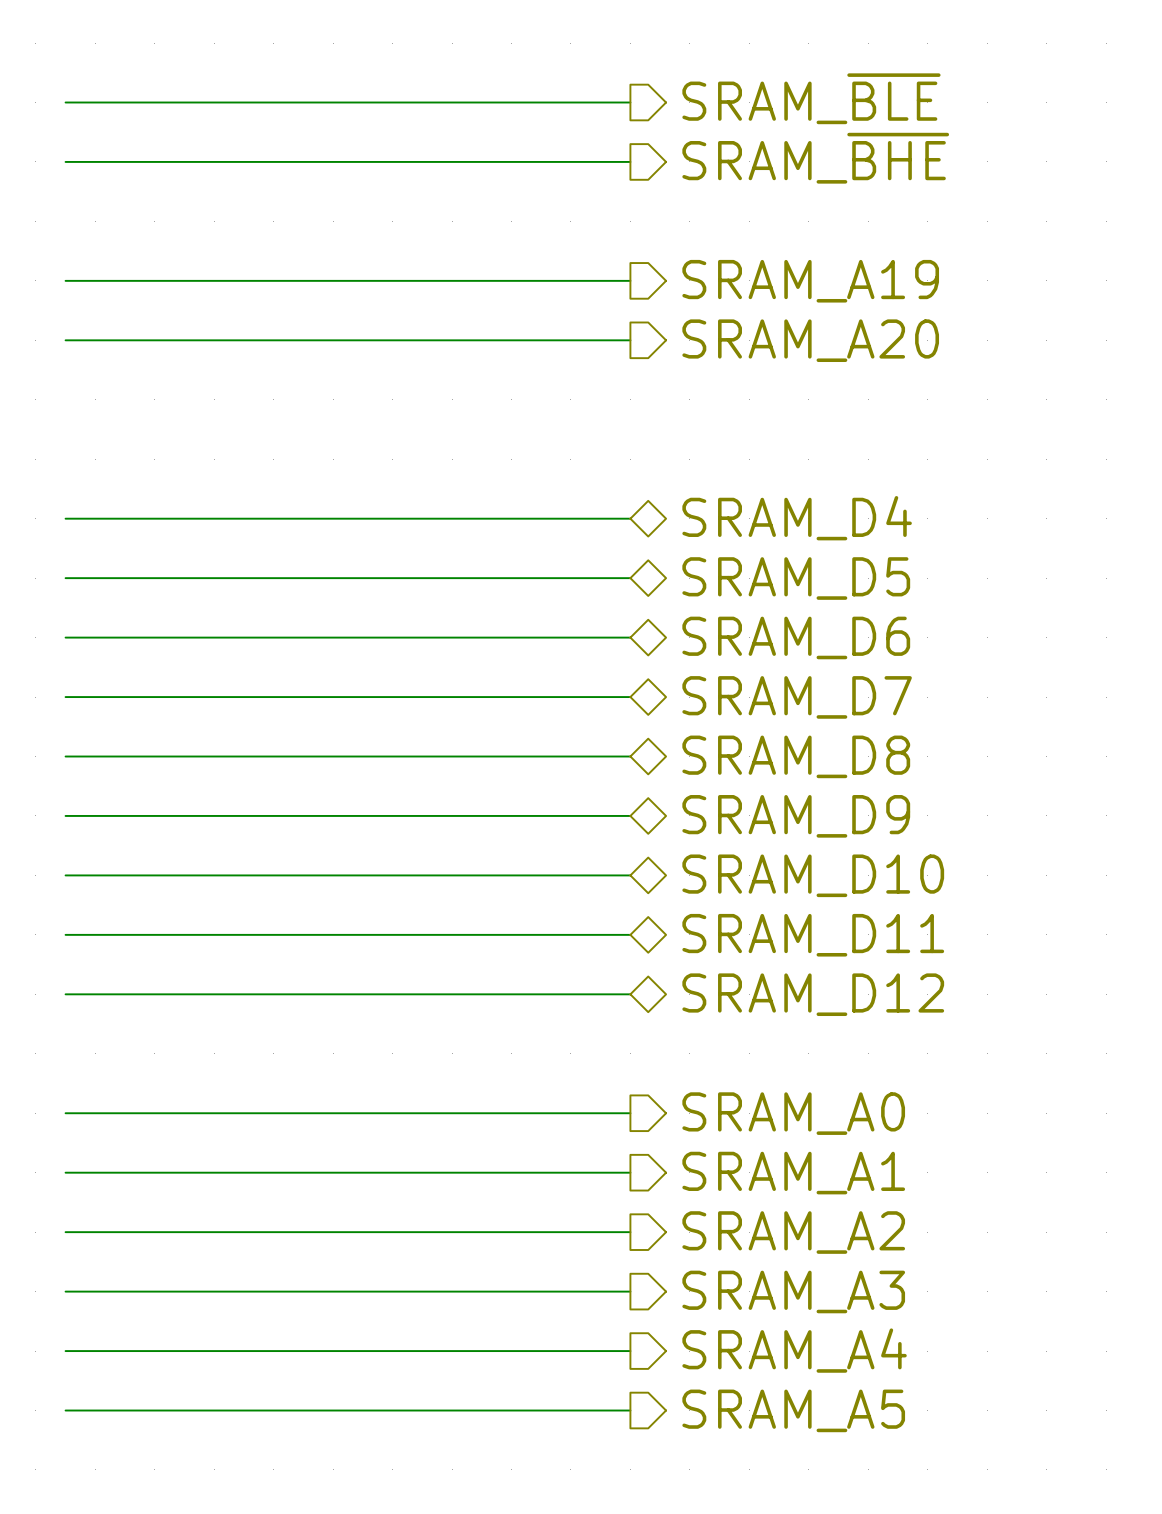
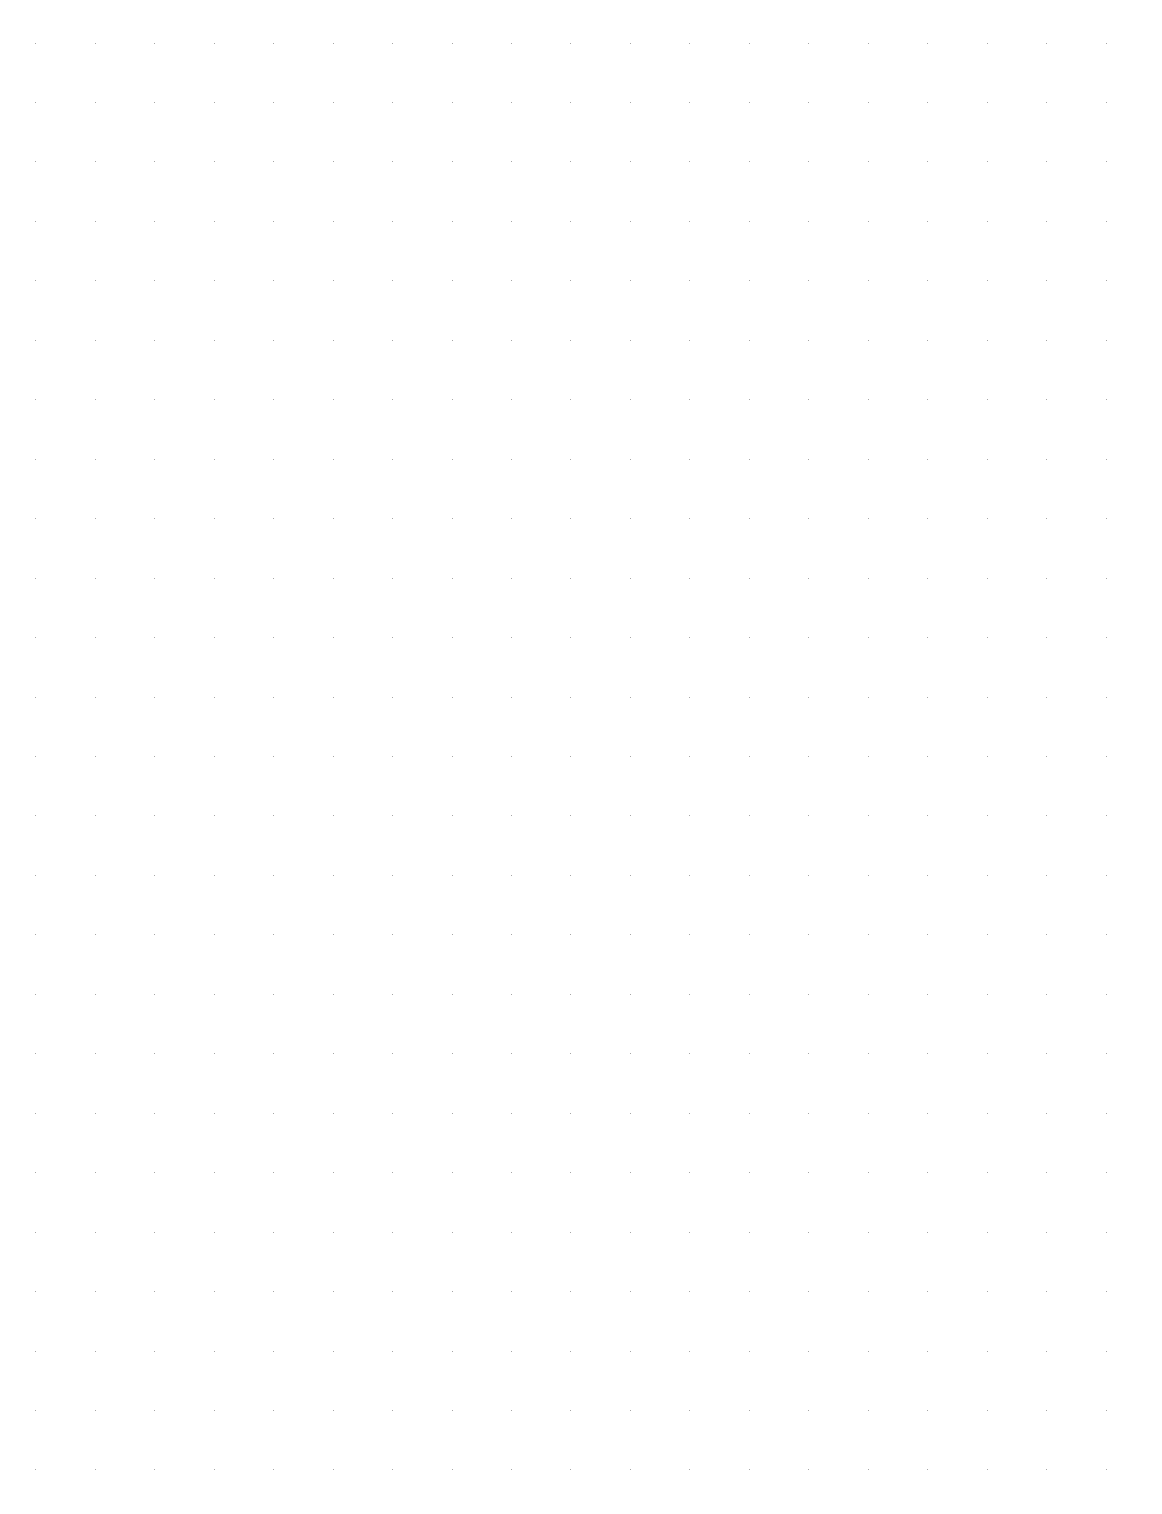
hierarchical label: SRAM_~{BLE} (811, 98) -> none
wire: (65, 102) (630, 102) -> none
hierarchical label: SRAM_~{BHE} (815, 158) -> none
wire: (65, 161) (630, 161) -> none
wire: (65, 280) (630, 280) -> none
hierarchical label: SRAM_A19 (810, 281) -> none
wire: (65, 340) (630, 340) -> none
hierarchical label: SRAM_A20 (810, 340) -> none
wire: (65, 518) (630, 518) -> none
hierarchical label: SRAM_D4 (797, 518) -> none
wire: (65, 578) (630, 578) -> none
hierarchical label: SRAM_D5 (796, 578) -> none
wire: (65, 637) (630, 637) -> none
hierarchical label: SRAM_D6 (796, 637) -> none
wire: (65, 697) (630, 697) -> none
hierarchical label: SRAM_D7 (797, 697) -> none
wire: (65, 756) (630, 756) -> none
hierarchical label: SRAM_D8 (796, 756) -> none
wire: (65, 815) (630, 815) -> none
hierarchical label: SRAM_D9 (796, 816) -> none
wire: (65, 875) (630, 875) -> none
hierarchical label: SRAM_D10 (813, 875) -> none
wire: (65, 934) (630, 934) -> none
hierarchical label: SRAM_D11 (813, 935) -> none
wire: (65, 994) (630, 994) -> none
hierarchical label: SRAM_D12 (813, 994) -> none
wire: (65, 1113) (630, 1113) -> none
hierarchical label: SRAM_A0 (793, 1113) -> none
wire: (65, 1172) (630, 1172) -> none
hierarchical label: SRAM_A1 (793, 1173) -> none
wire: (65, 1232) (630, 1232) -> none
hierarchical label: SRAM_A2 (793, 1232) -> none
wire: (65, 1291) (630, 1291) -> none
hierarchical label: SRAM_A3 (793, 1291) -> none
hierarchical label: SRAM_A4 (794, 1350) -> none
wire: (65, 1351) (630, 1351) -> none
wire: (65, 1410) (630, 1410) -> none
hierarchical label: SRAM_A5 (793, 1410) -> none

